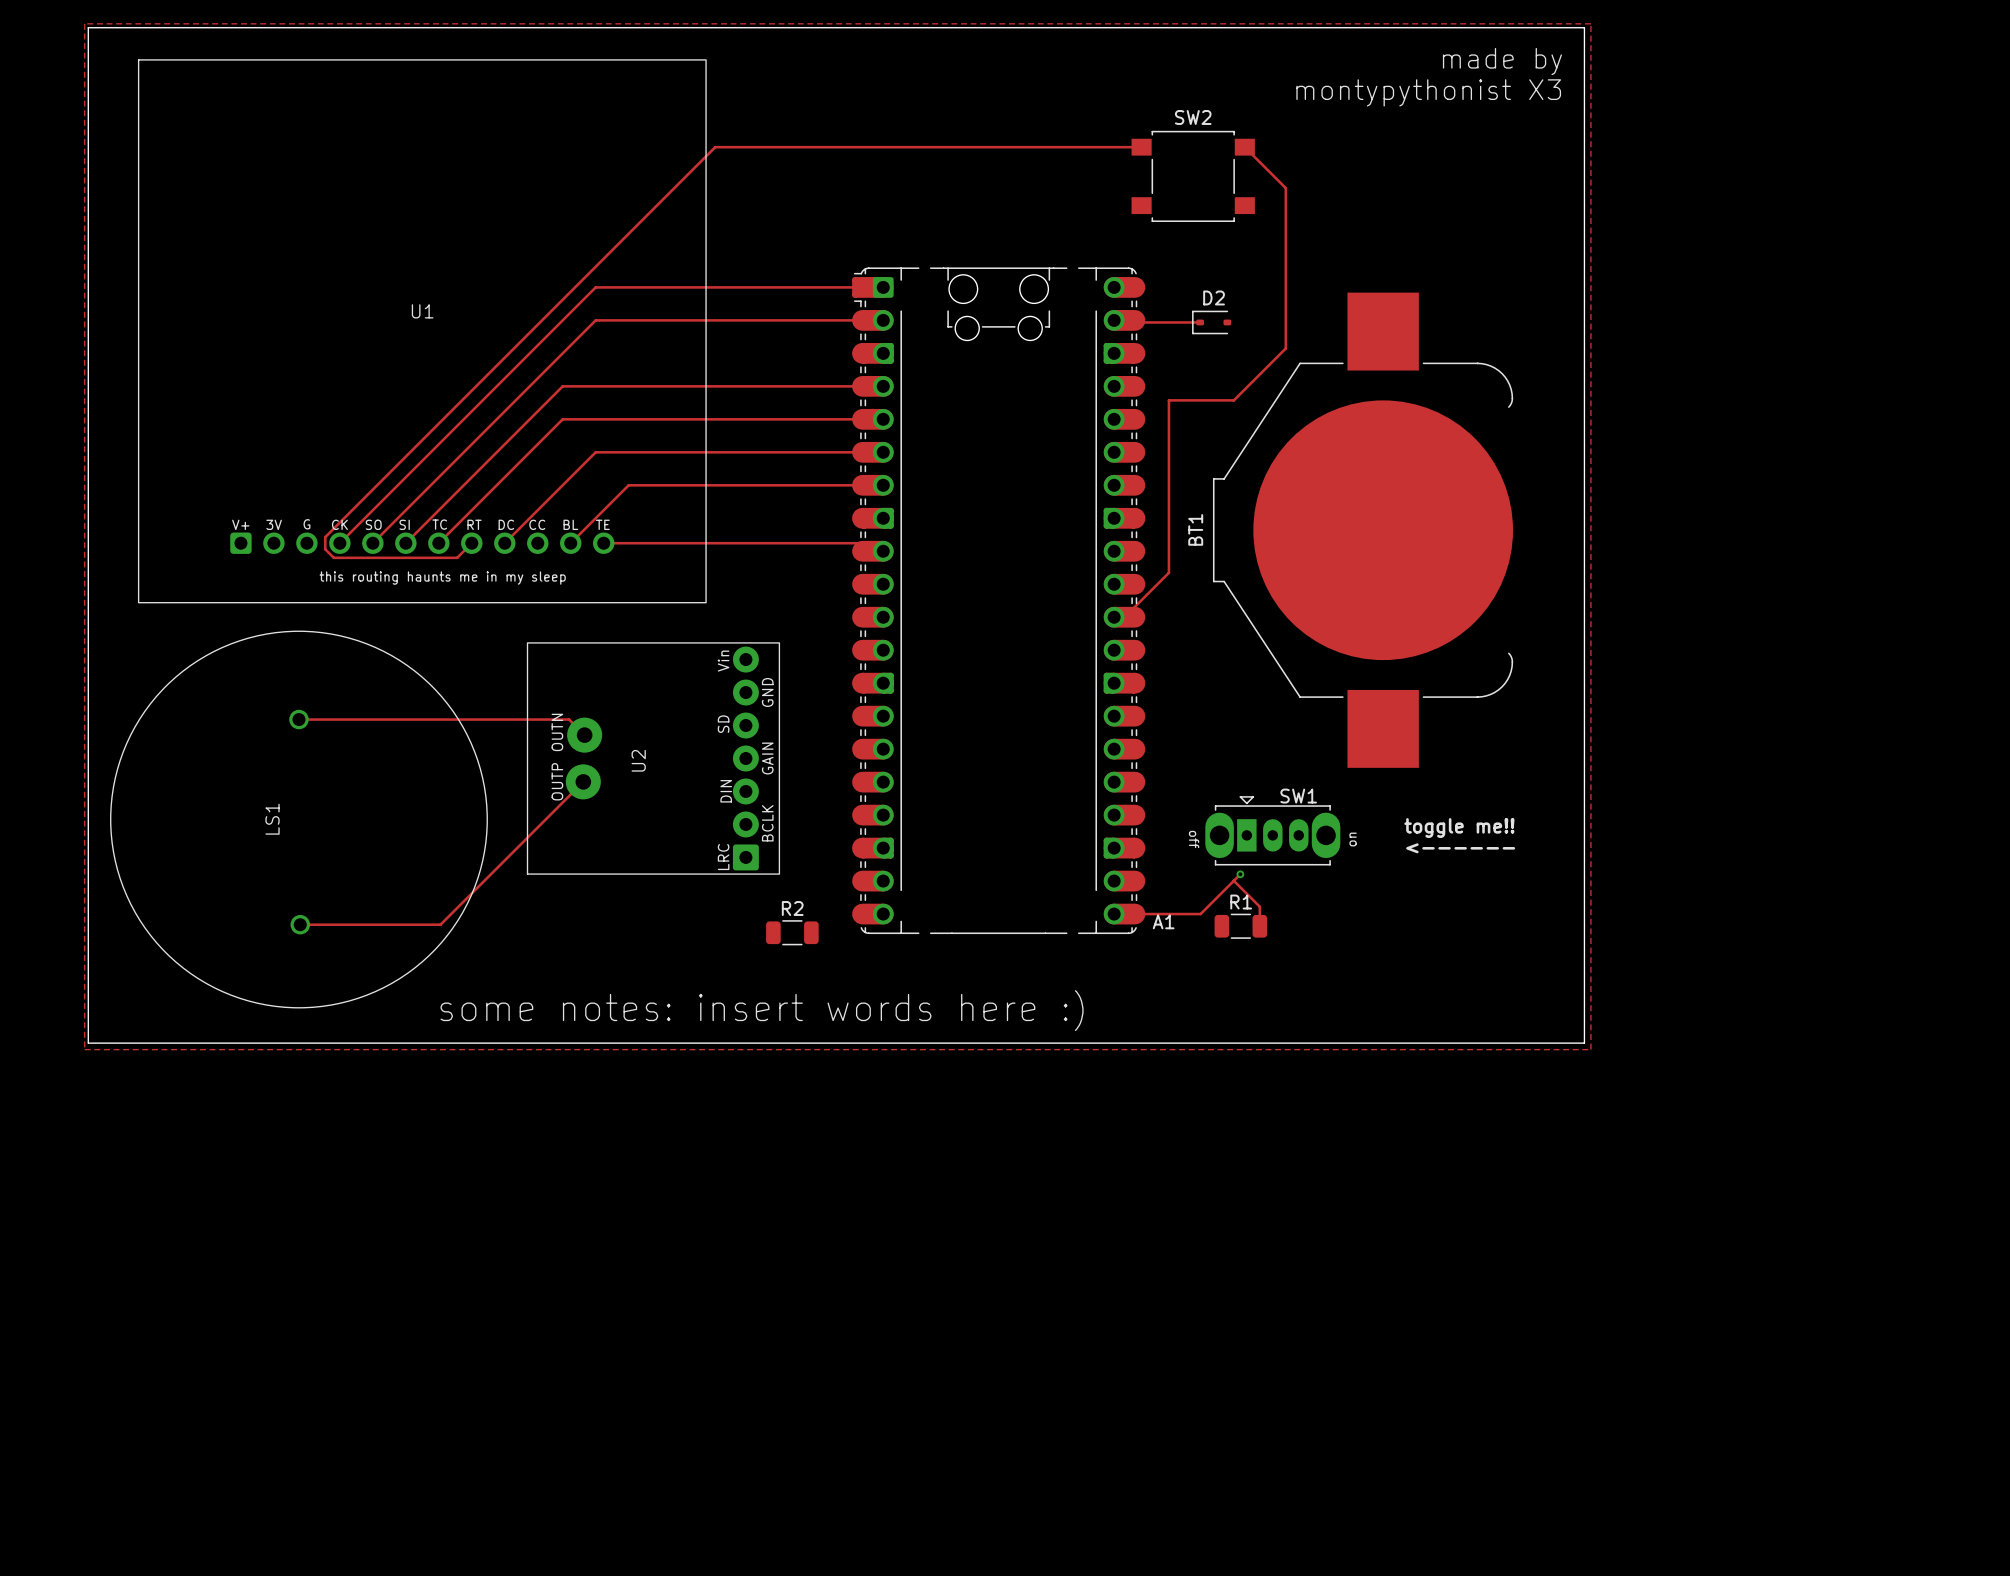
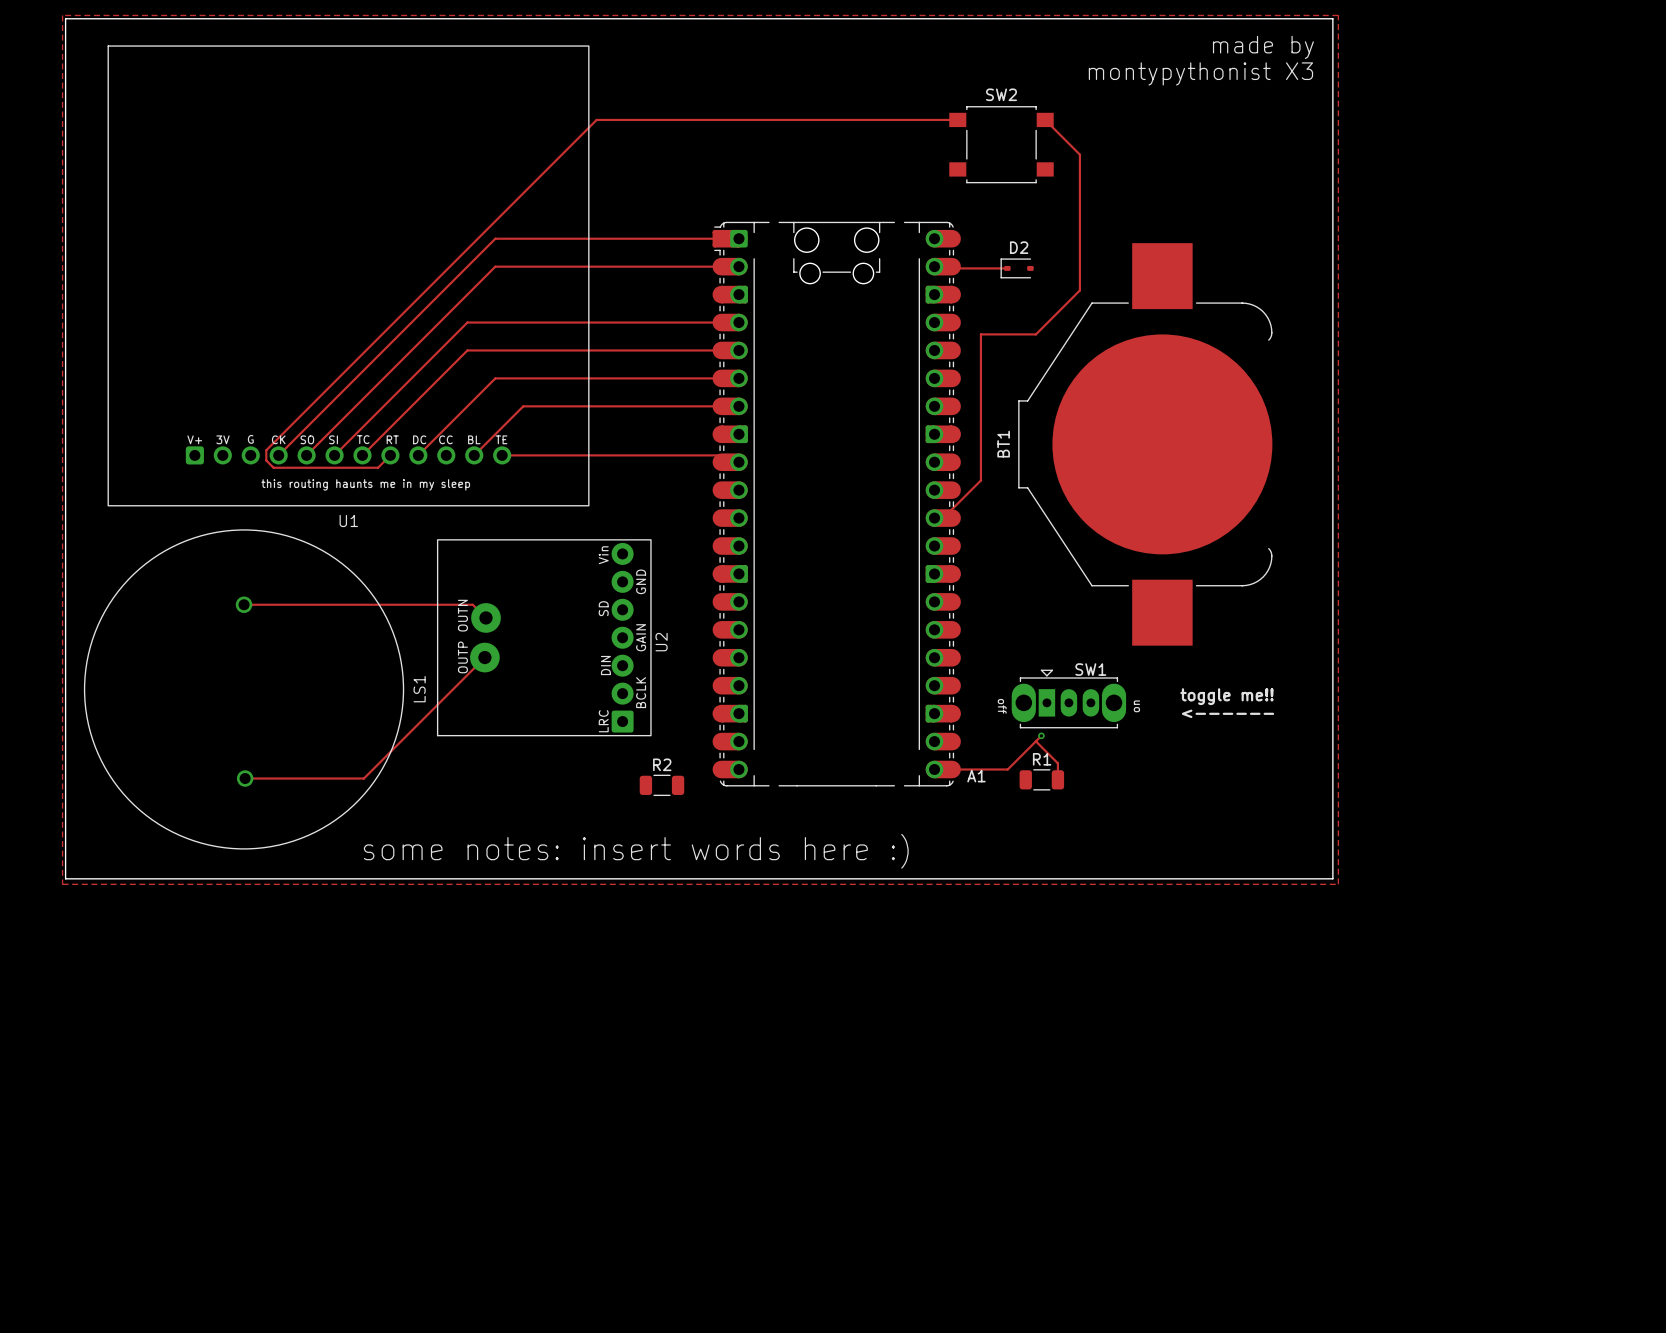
U1 name position: U1 (422, 311) -> U1 (348, 520)
U2 name position: U2 (638, 760) -> U2 (661, 642)
LS1 name position: LS1 (272, 819) -> LS1 (419, 689)

